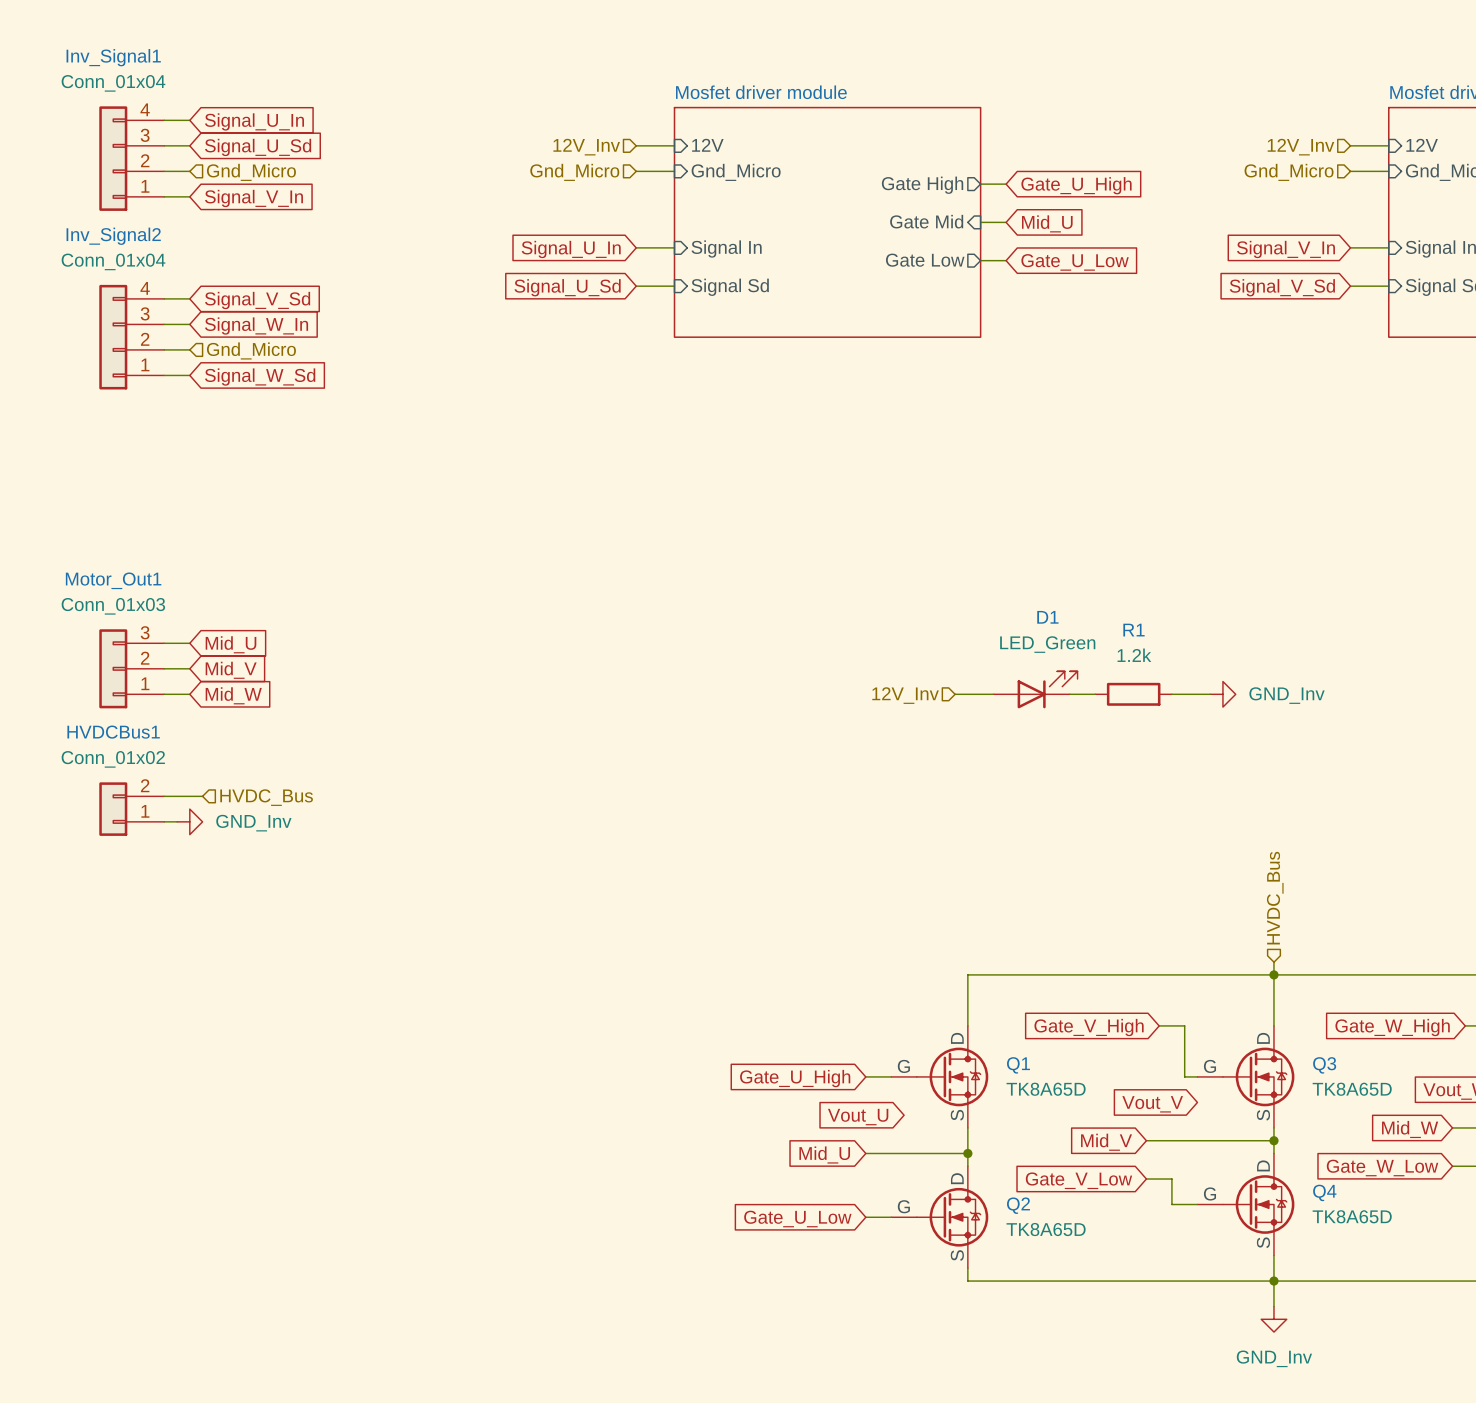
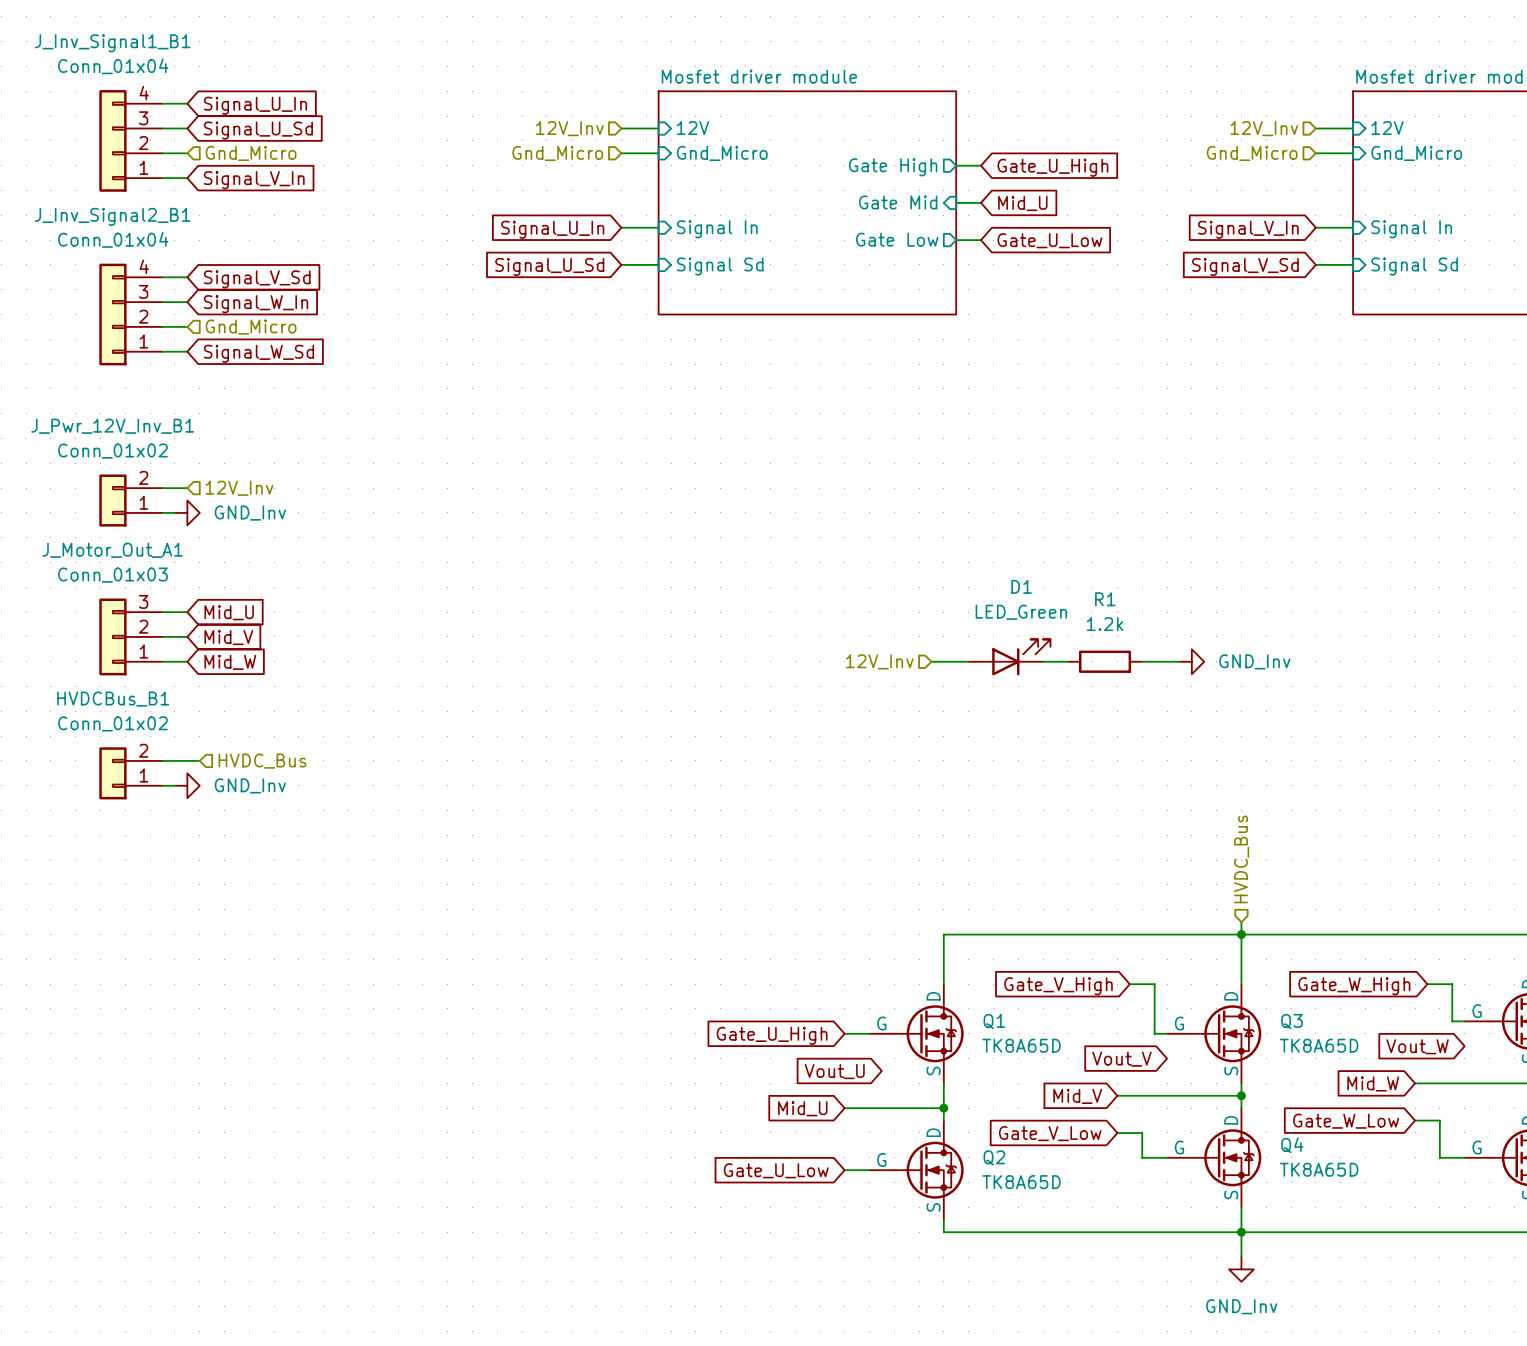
Inv_Signal1 name: Inv_Signal1 (113, 57) -> J_Inv_Signal1_B1 (112, 43)
Inv_Signal2 name: Inv_Signal2 (113, 236) -> J_Inv_Signal2_B1 (112, 216)
wire: none -> (162, 488) (187, 488)
hierarchical label: none -> 12V_Inv (239, 488)
J_Pwr_12V_Inv_B1: none -> Conn_01x02 (130, 500)
wire: none -> (162, 512) (174, 512)
power symbol: none -> GND_Inv (187, 512)
Motor_Out1 name: Motor_Out1 (113, 580) -> J_Motor_Out_A1 (112, 550)
HVDCBus1 name: HVDCBus1 (113, 732) -> HVDCBus_B1 (113, 699)

